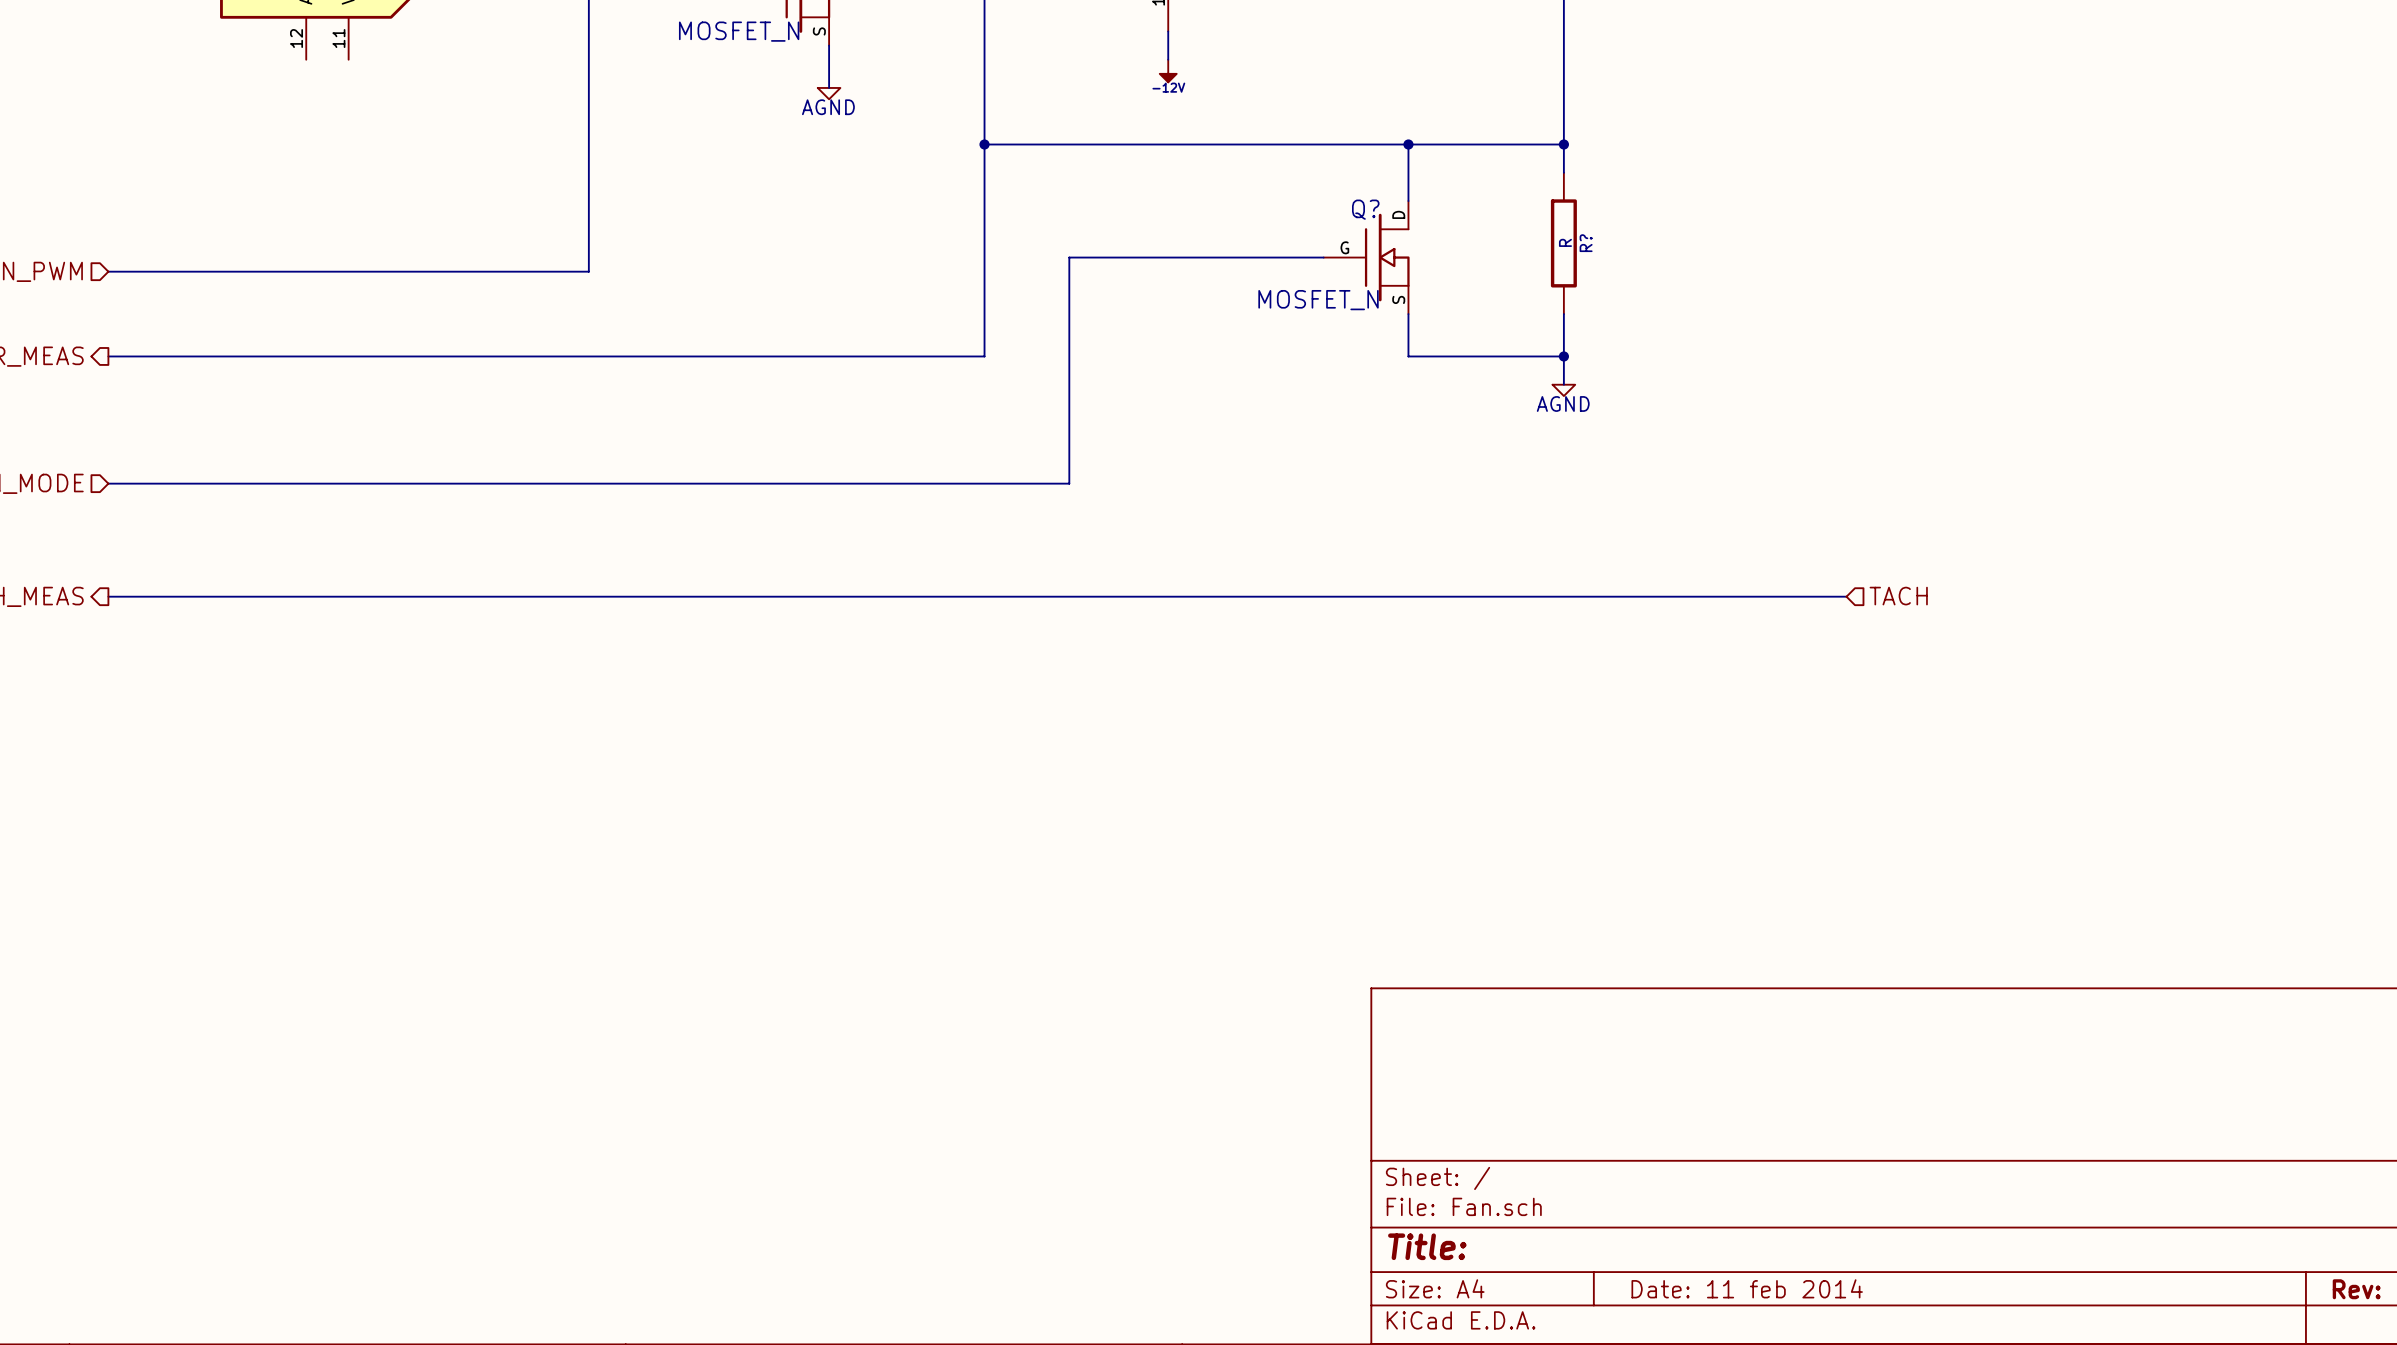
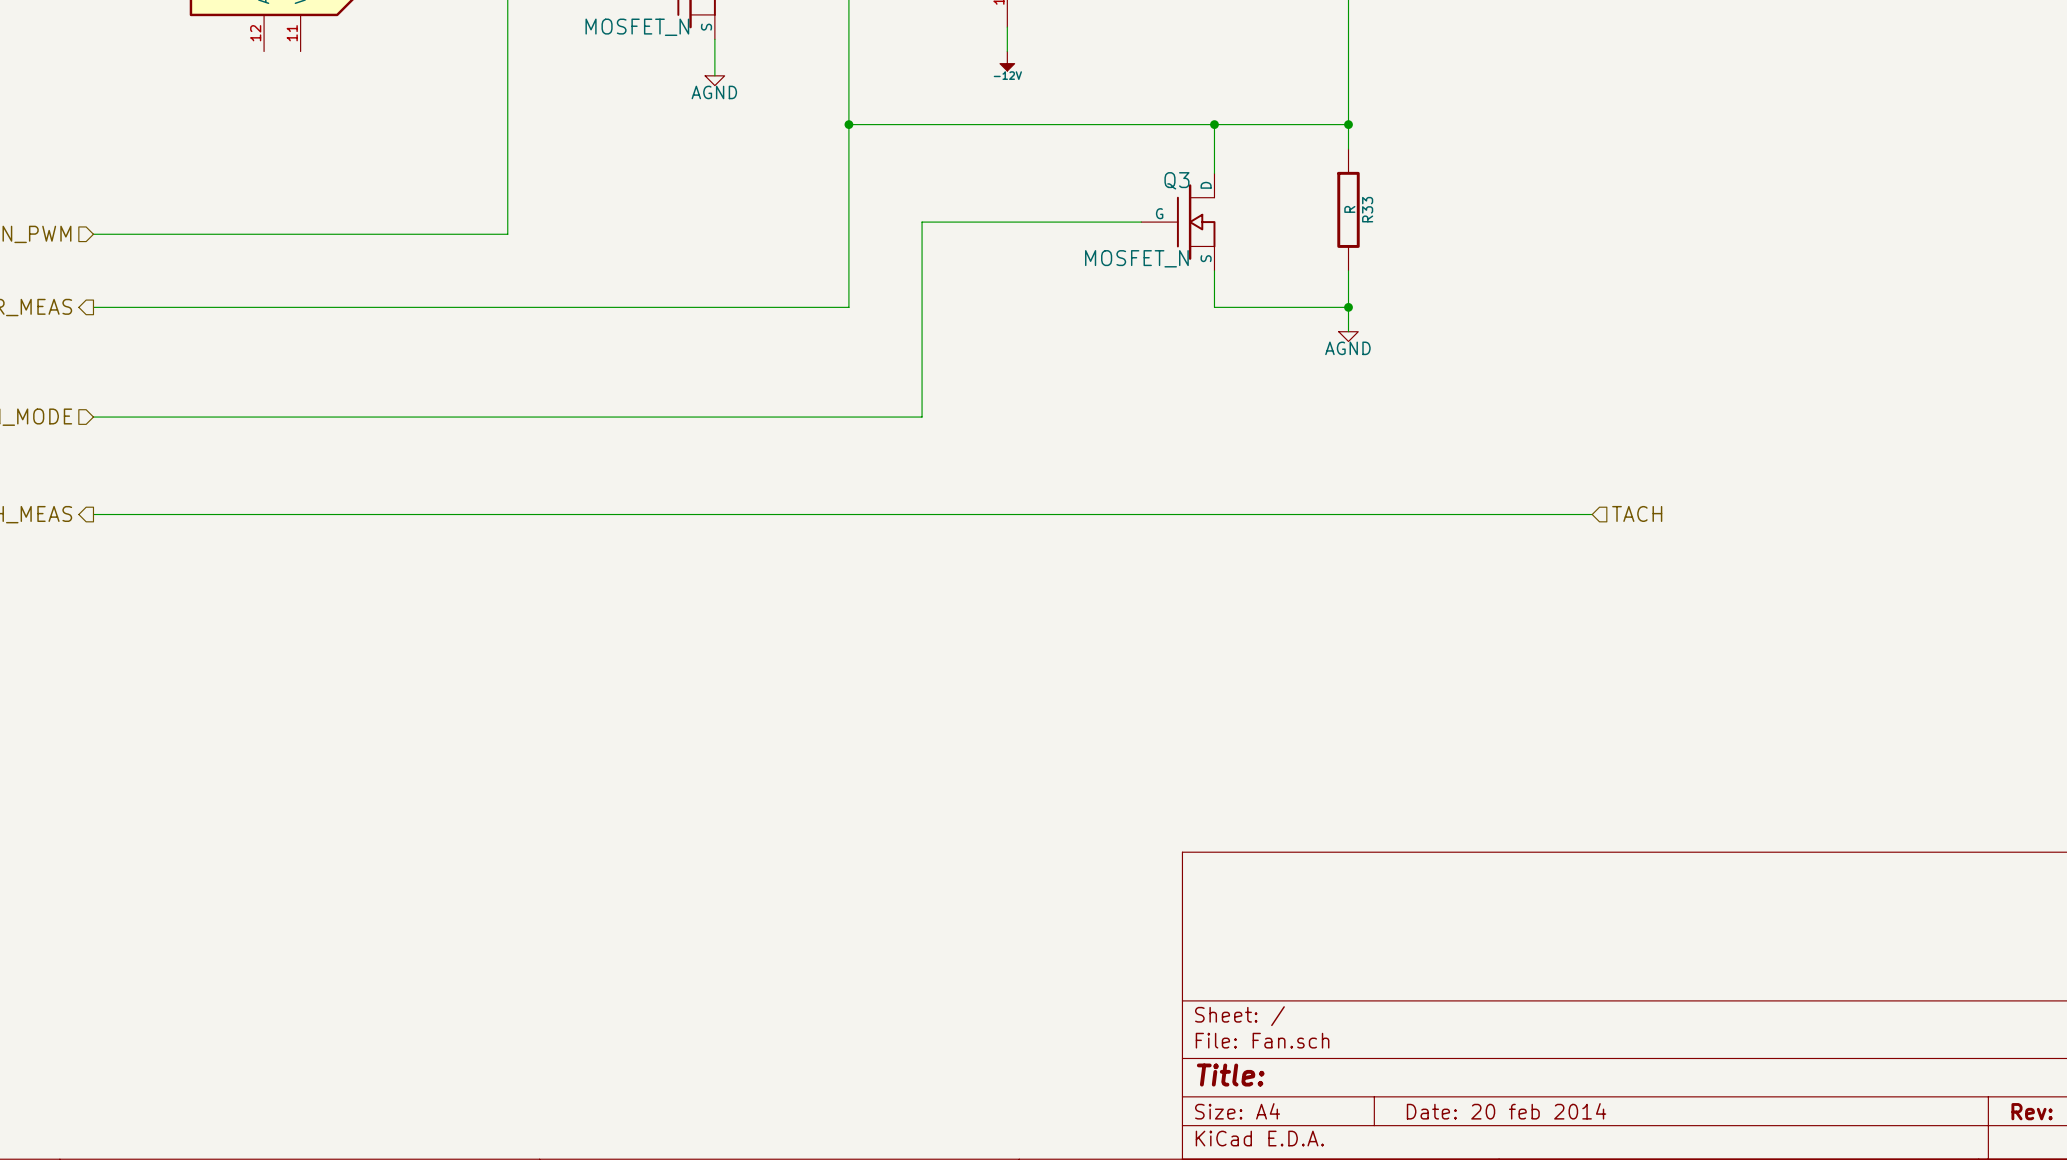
Q? name: Q? (1365, 209) -> Q3 (1176, 180)
R? name: R? (1586, 243) -> R33 (1367, 209)
title block: Date: 11 feb 2014 (1747, 1288) -> Date: 20 feb 2014 (1506, 1111)

